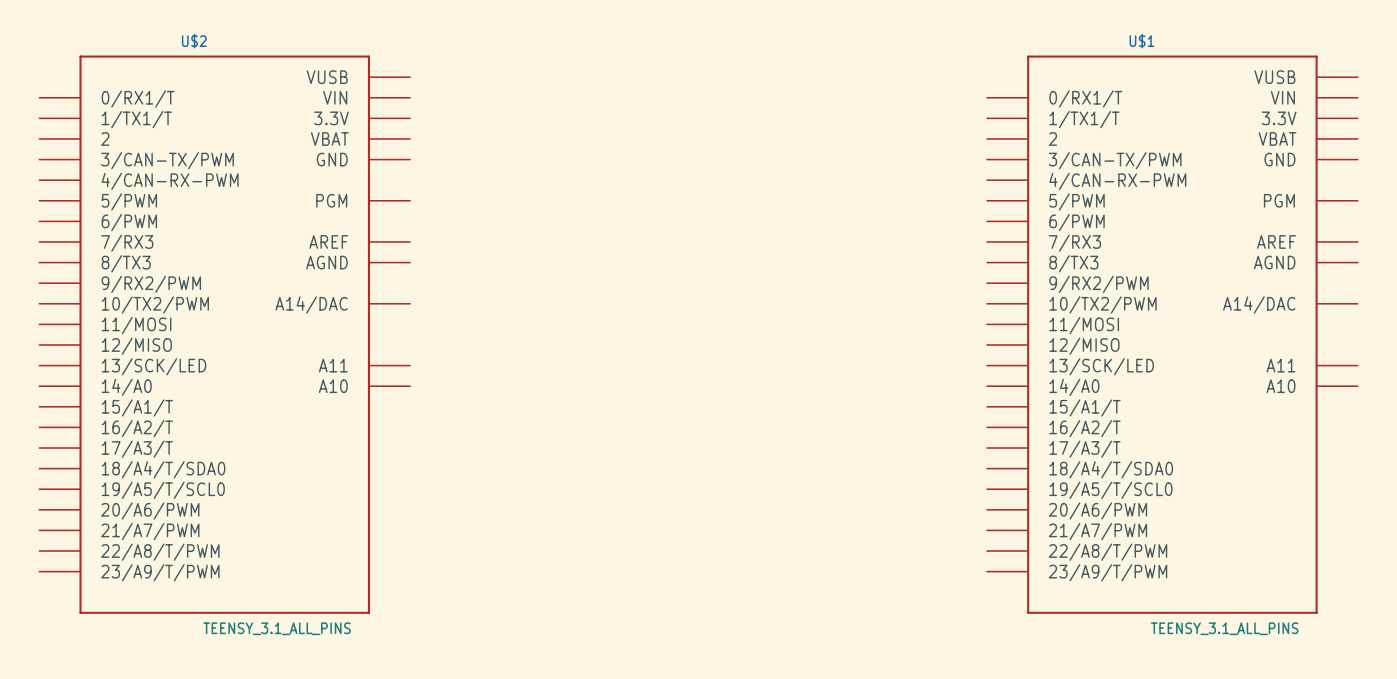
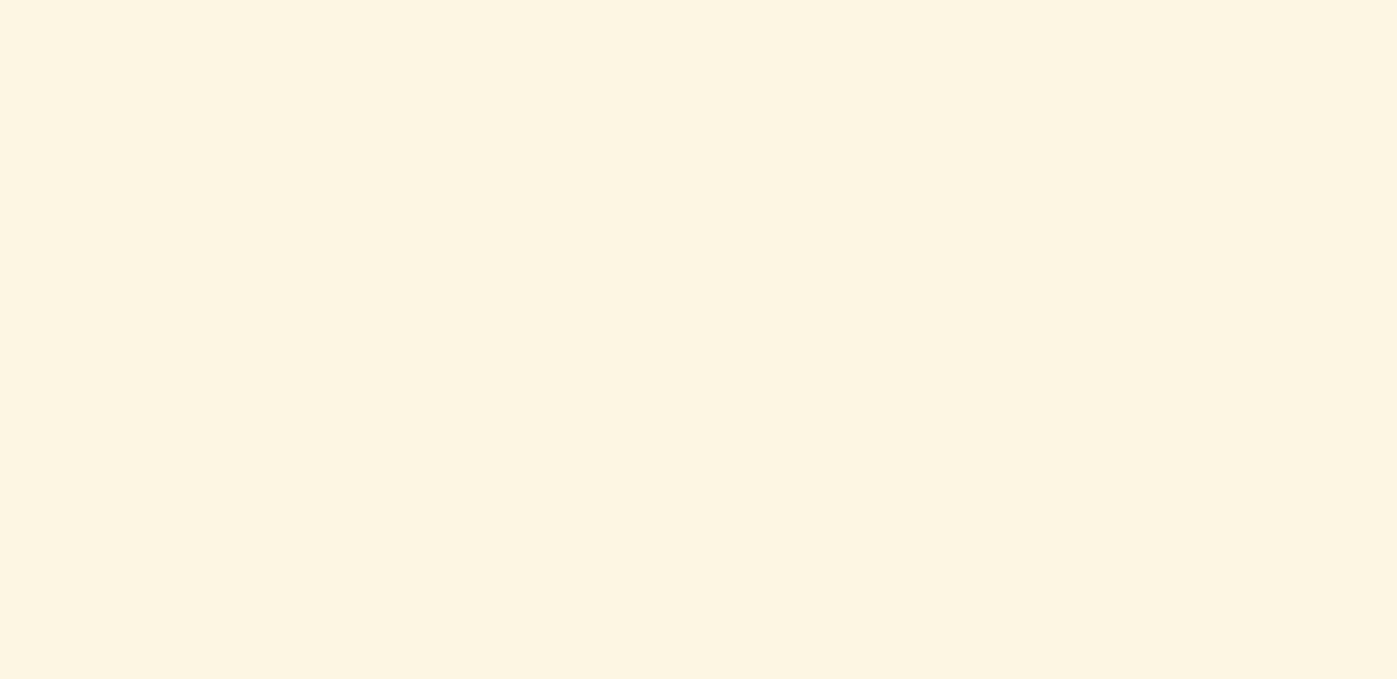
U$2: TEENSY_3.1_ALL_PINS (224, 334) -> none
U$1: TEENSY_3.1_ALL_PINS (1172, 334) -> none

